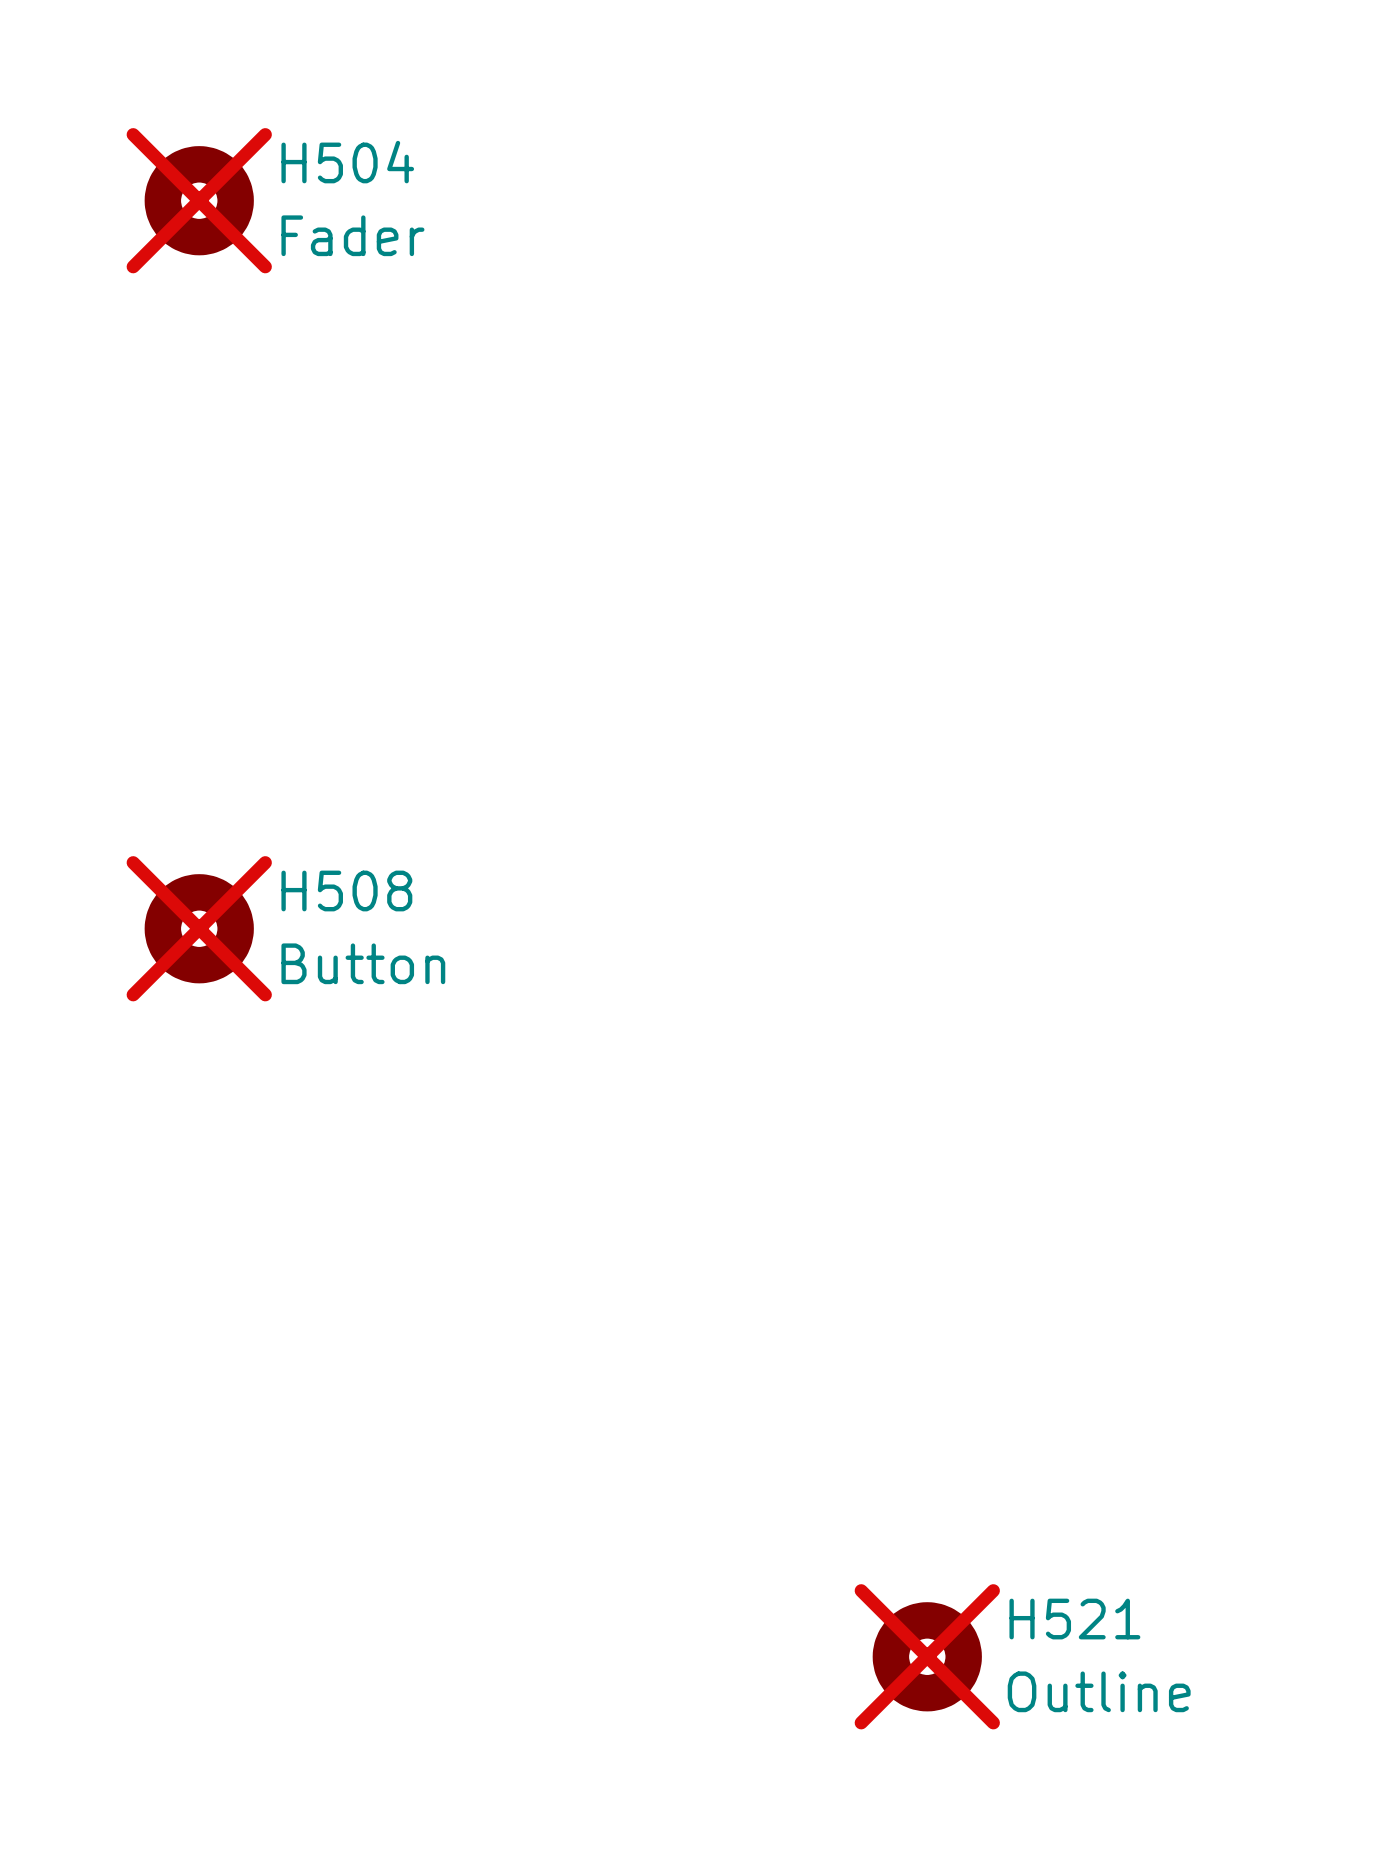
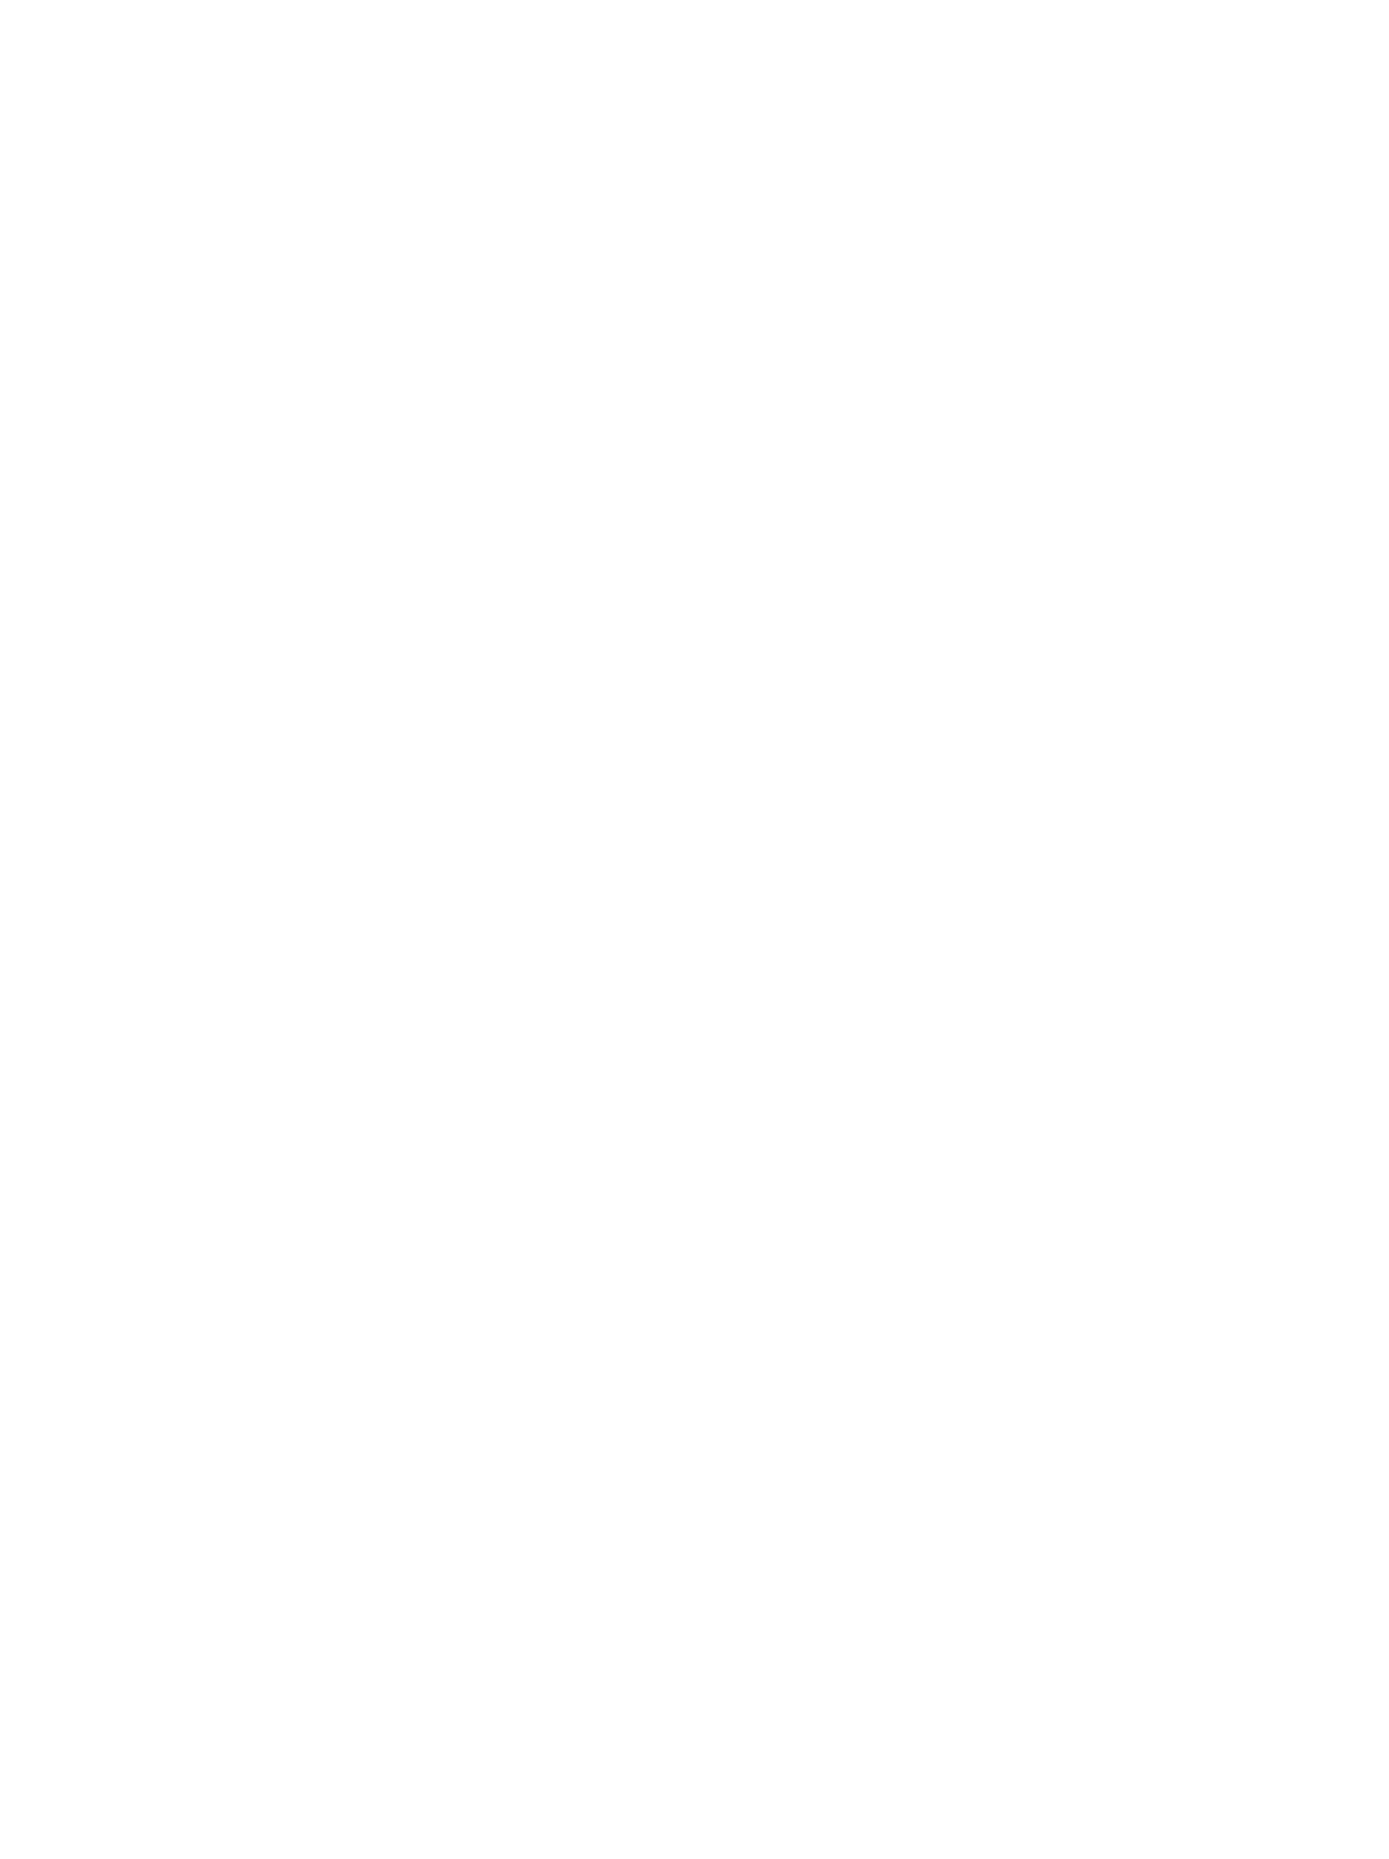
H504: Fader (199, 200) -> none
H508: Button (199, 928) -> none
H521: Outline (927, 1656) -> none

